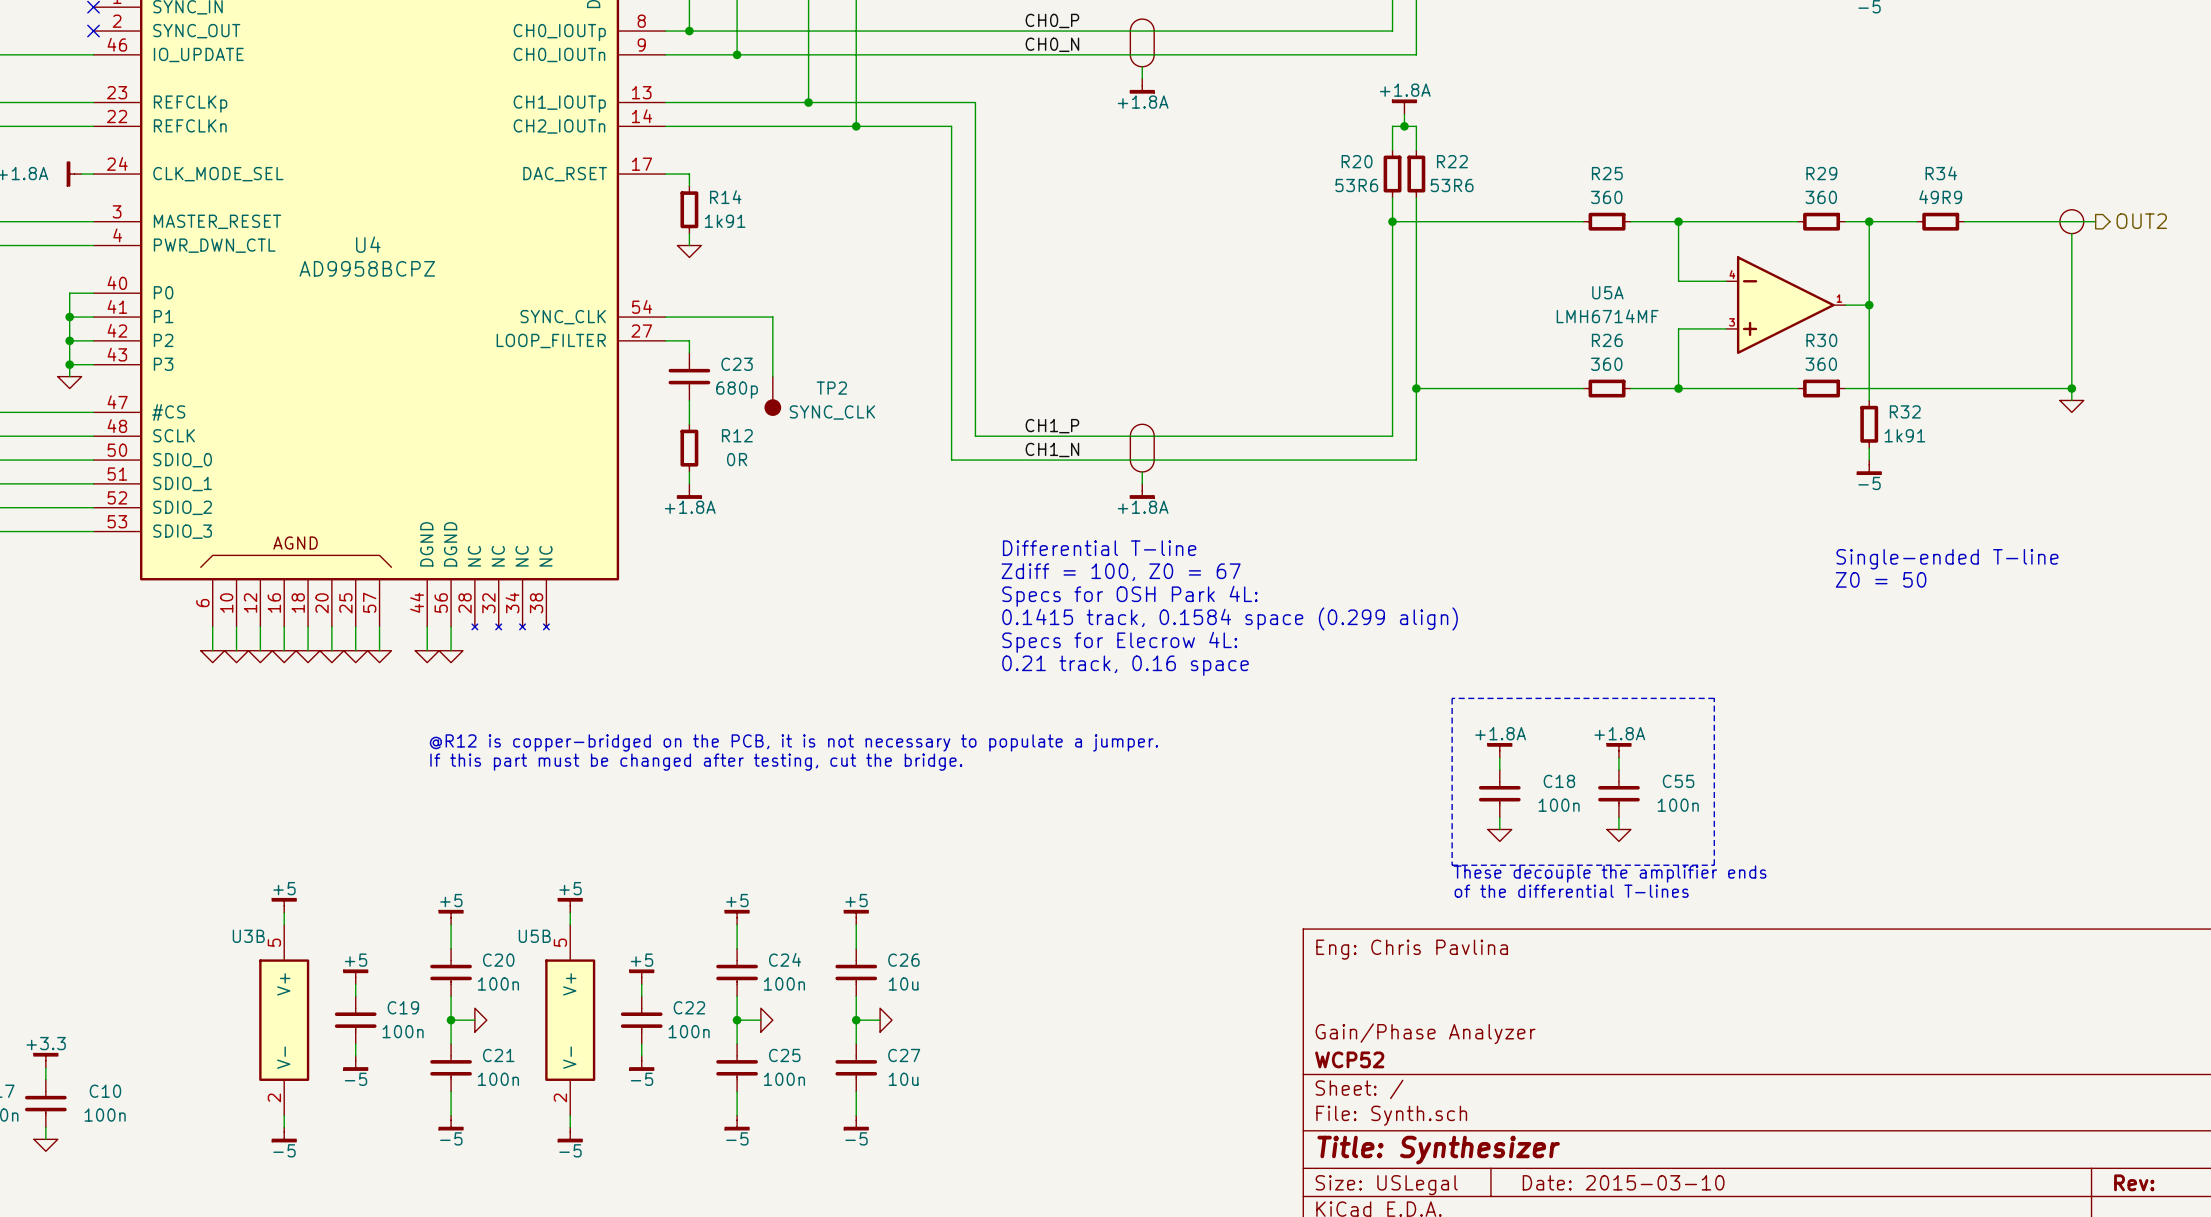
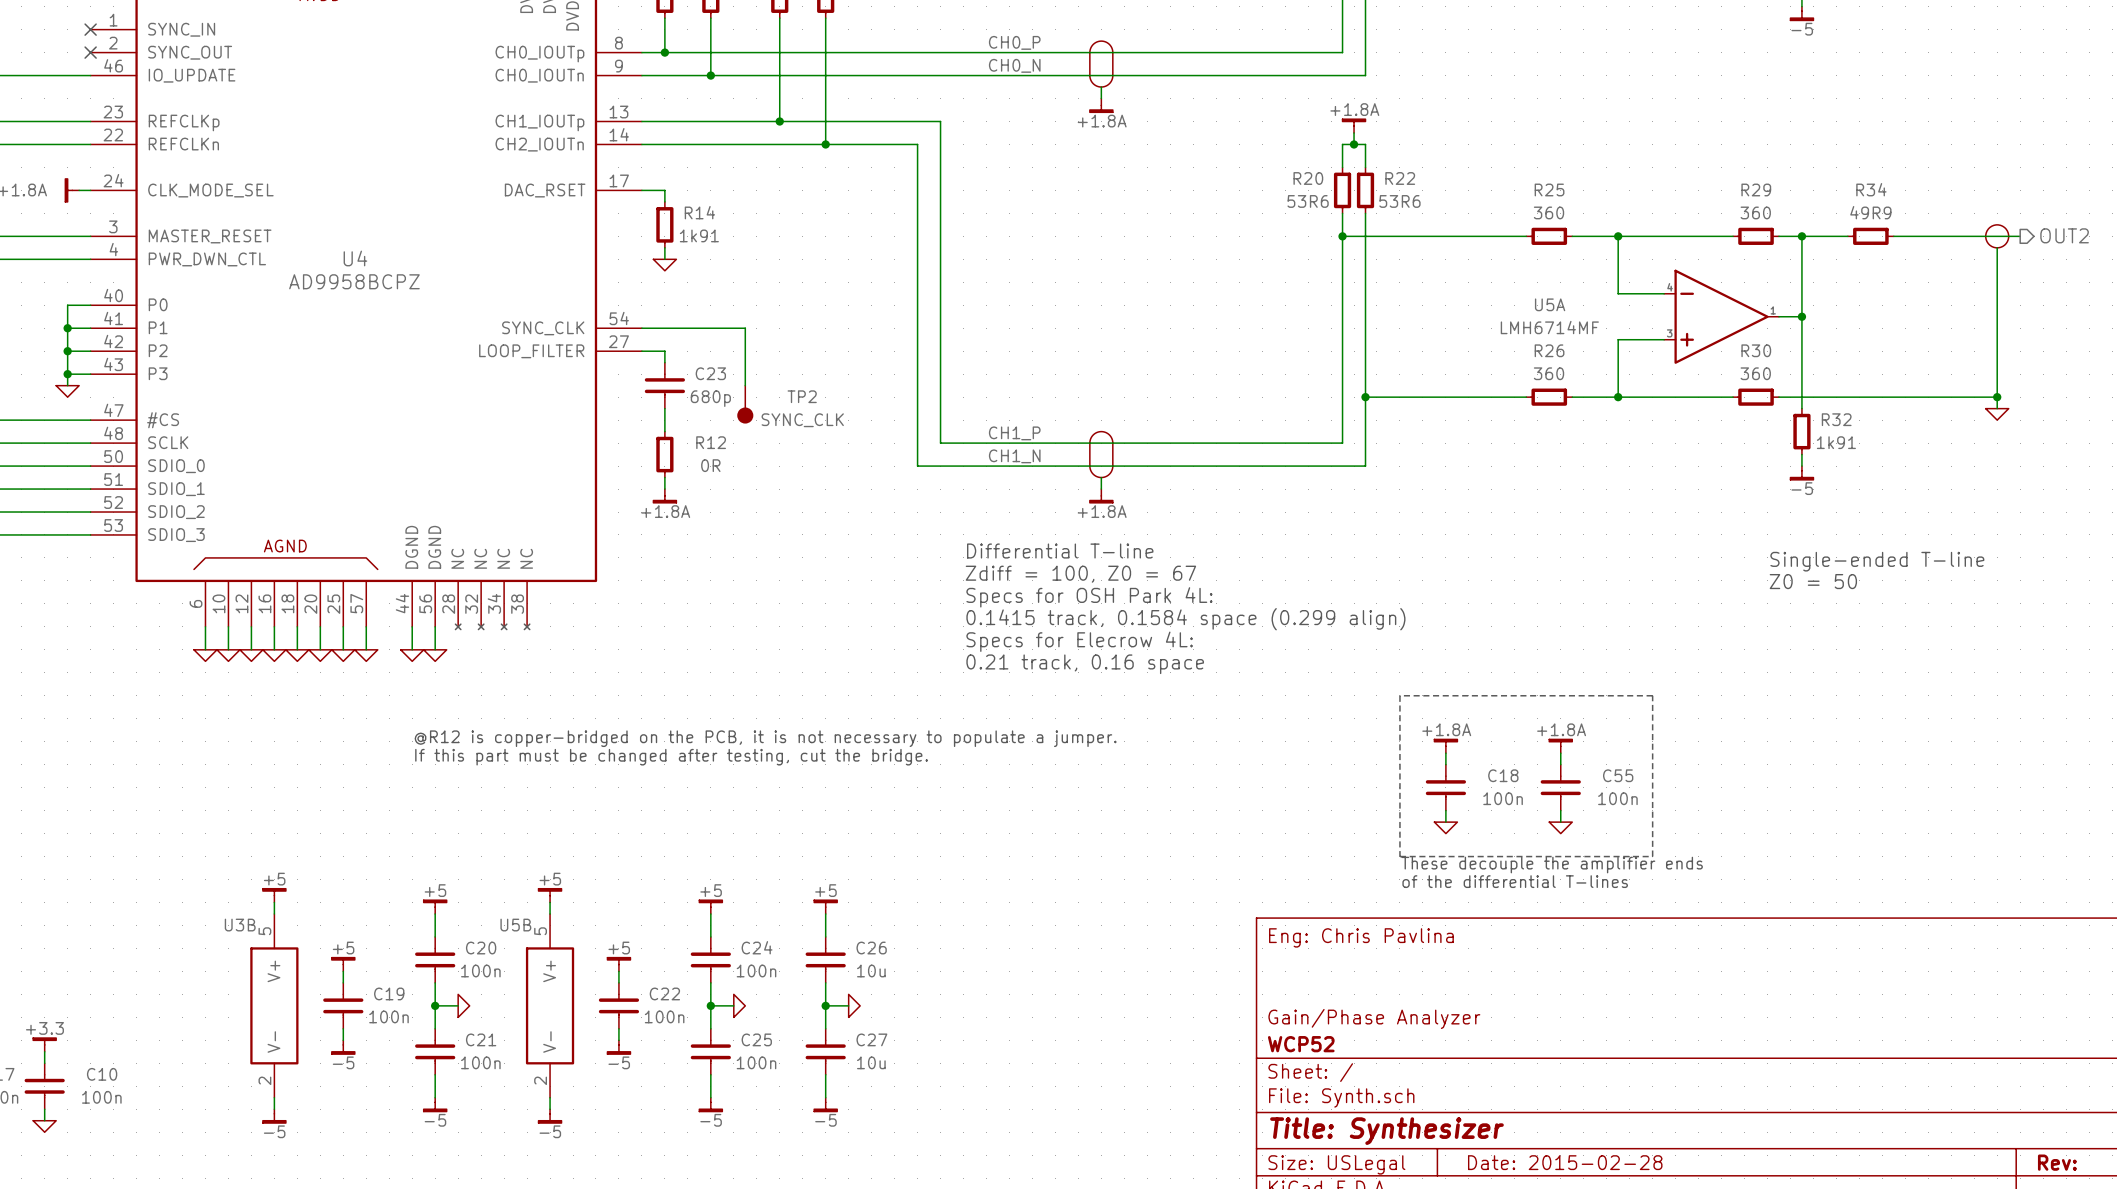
title block: Date: 2015-03-10 (1623, 1182) -> Date: 2015-02-28 (1565, 1162)

